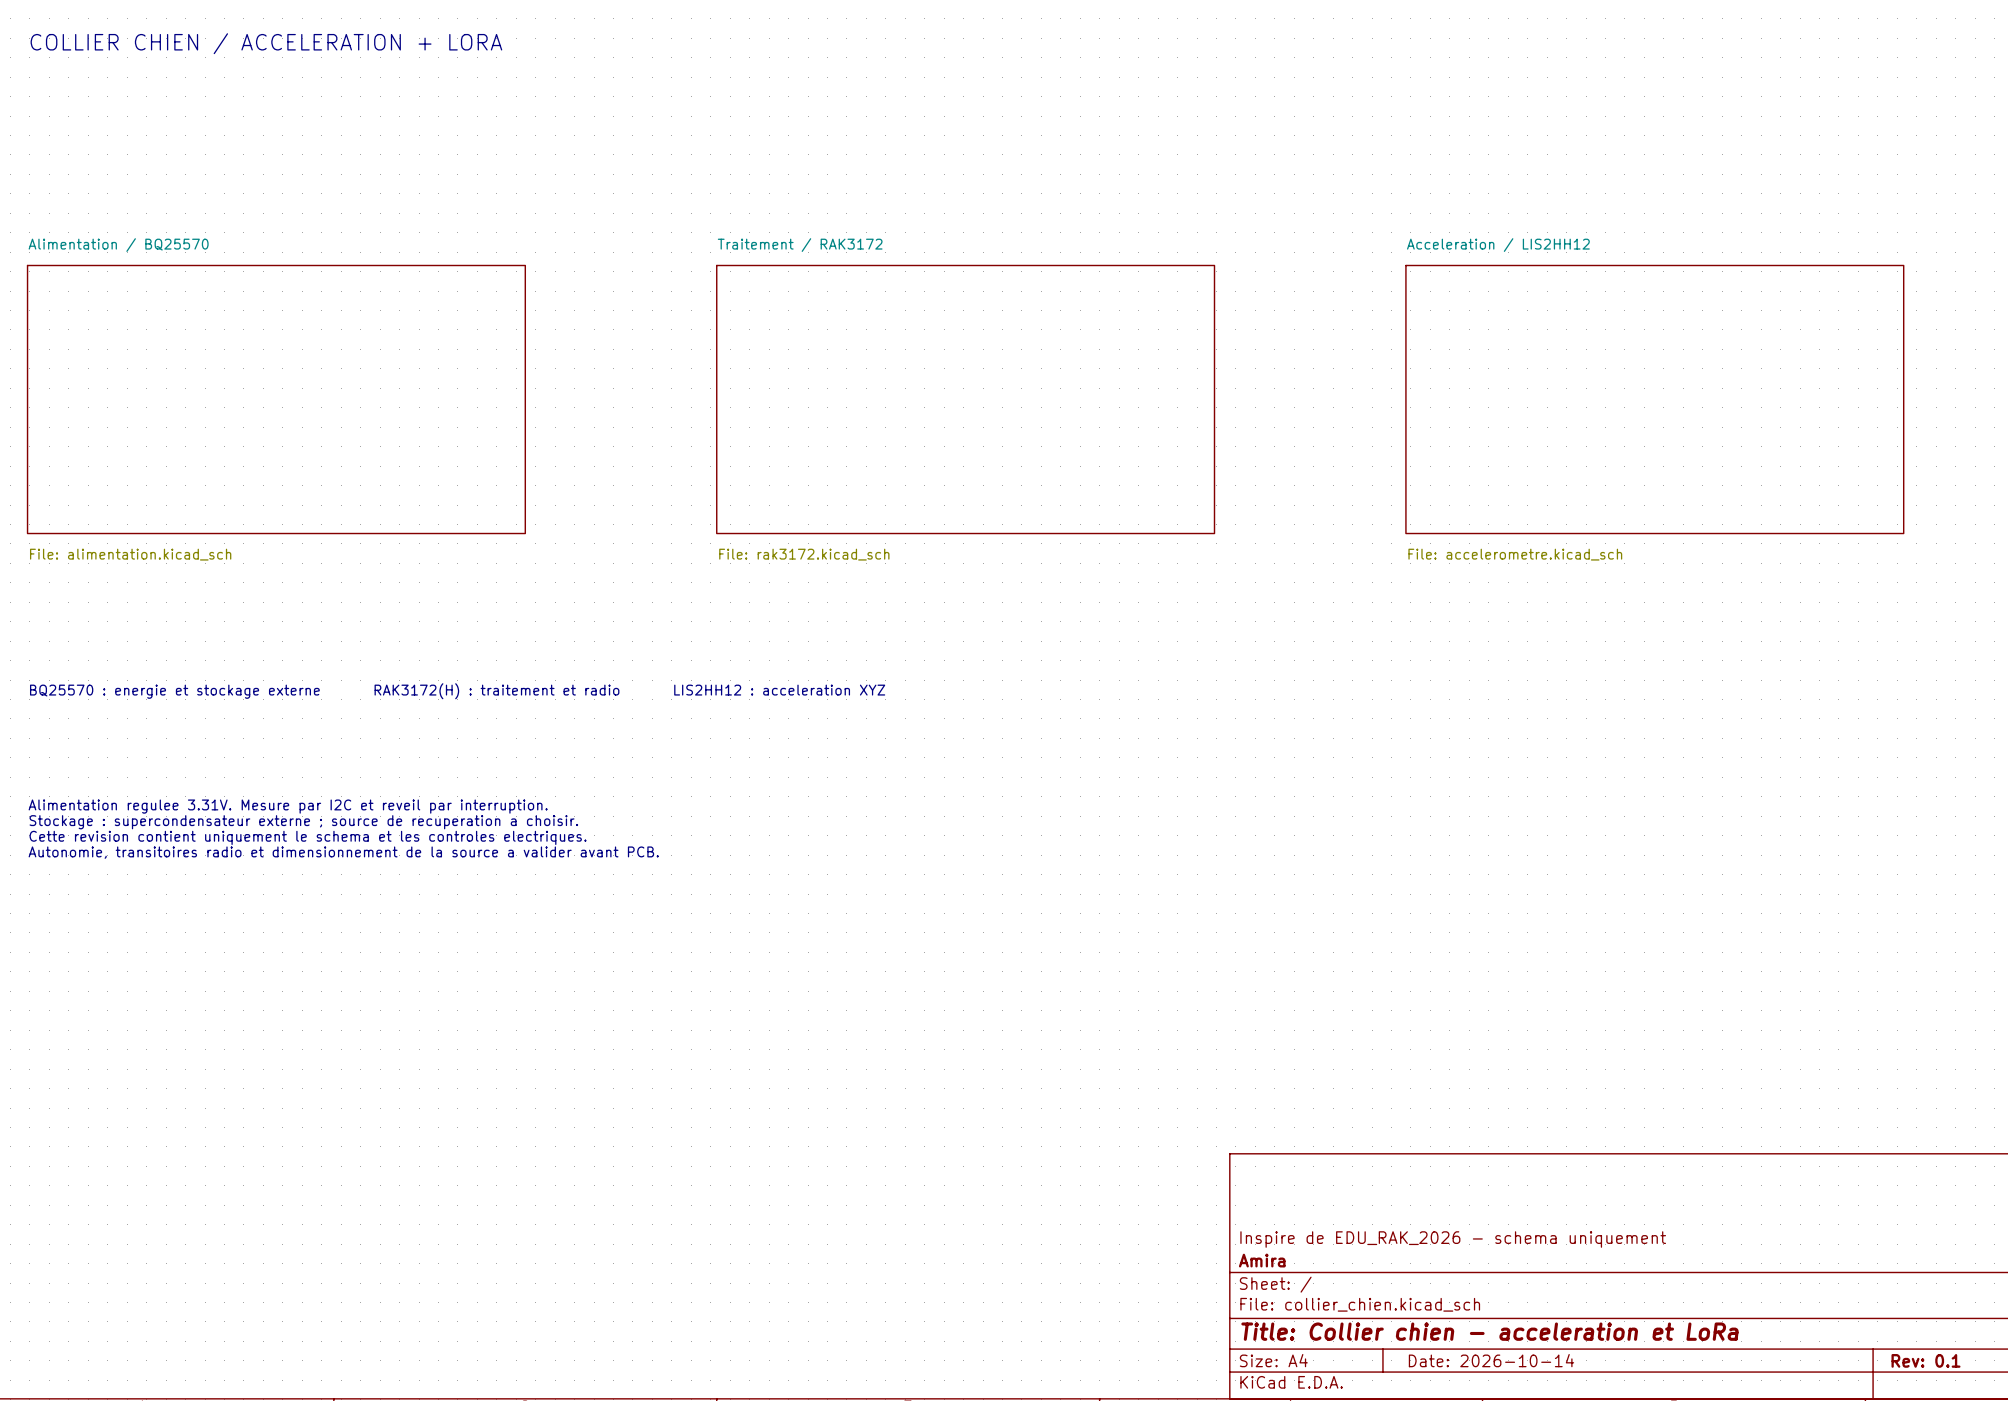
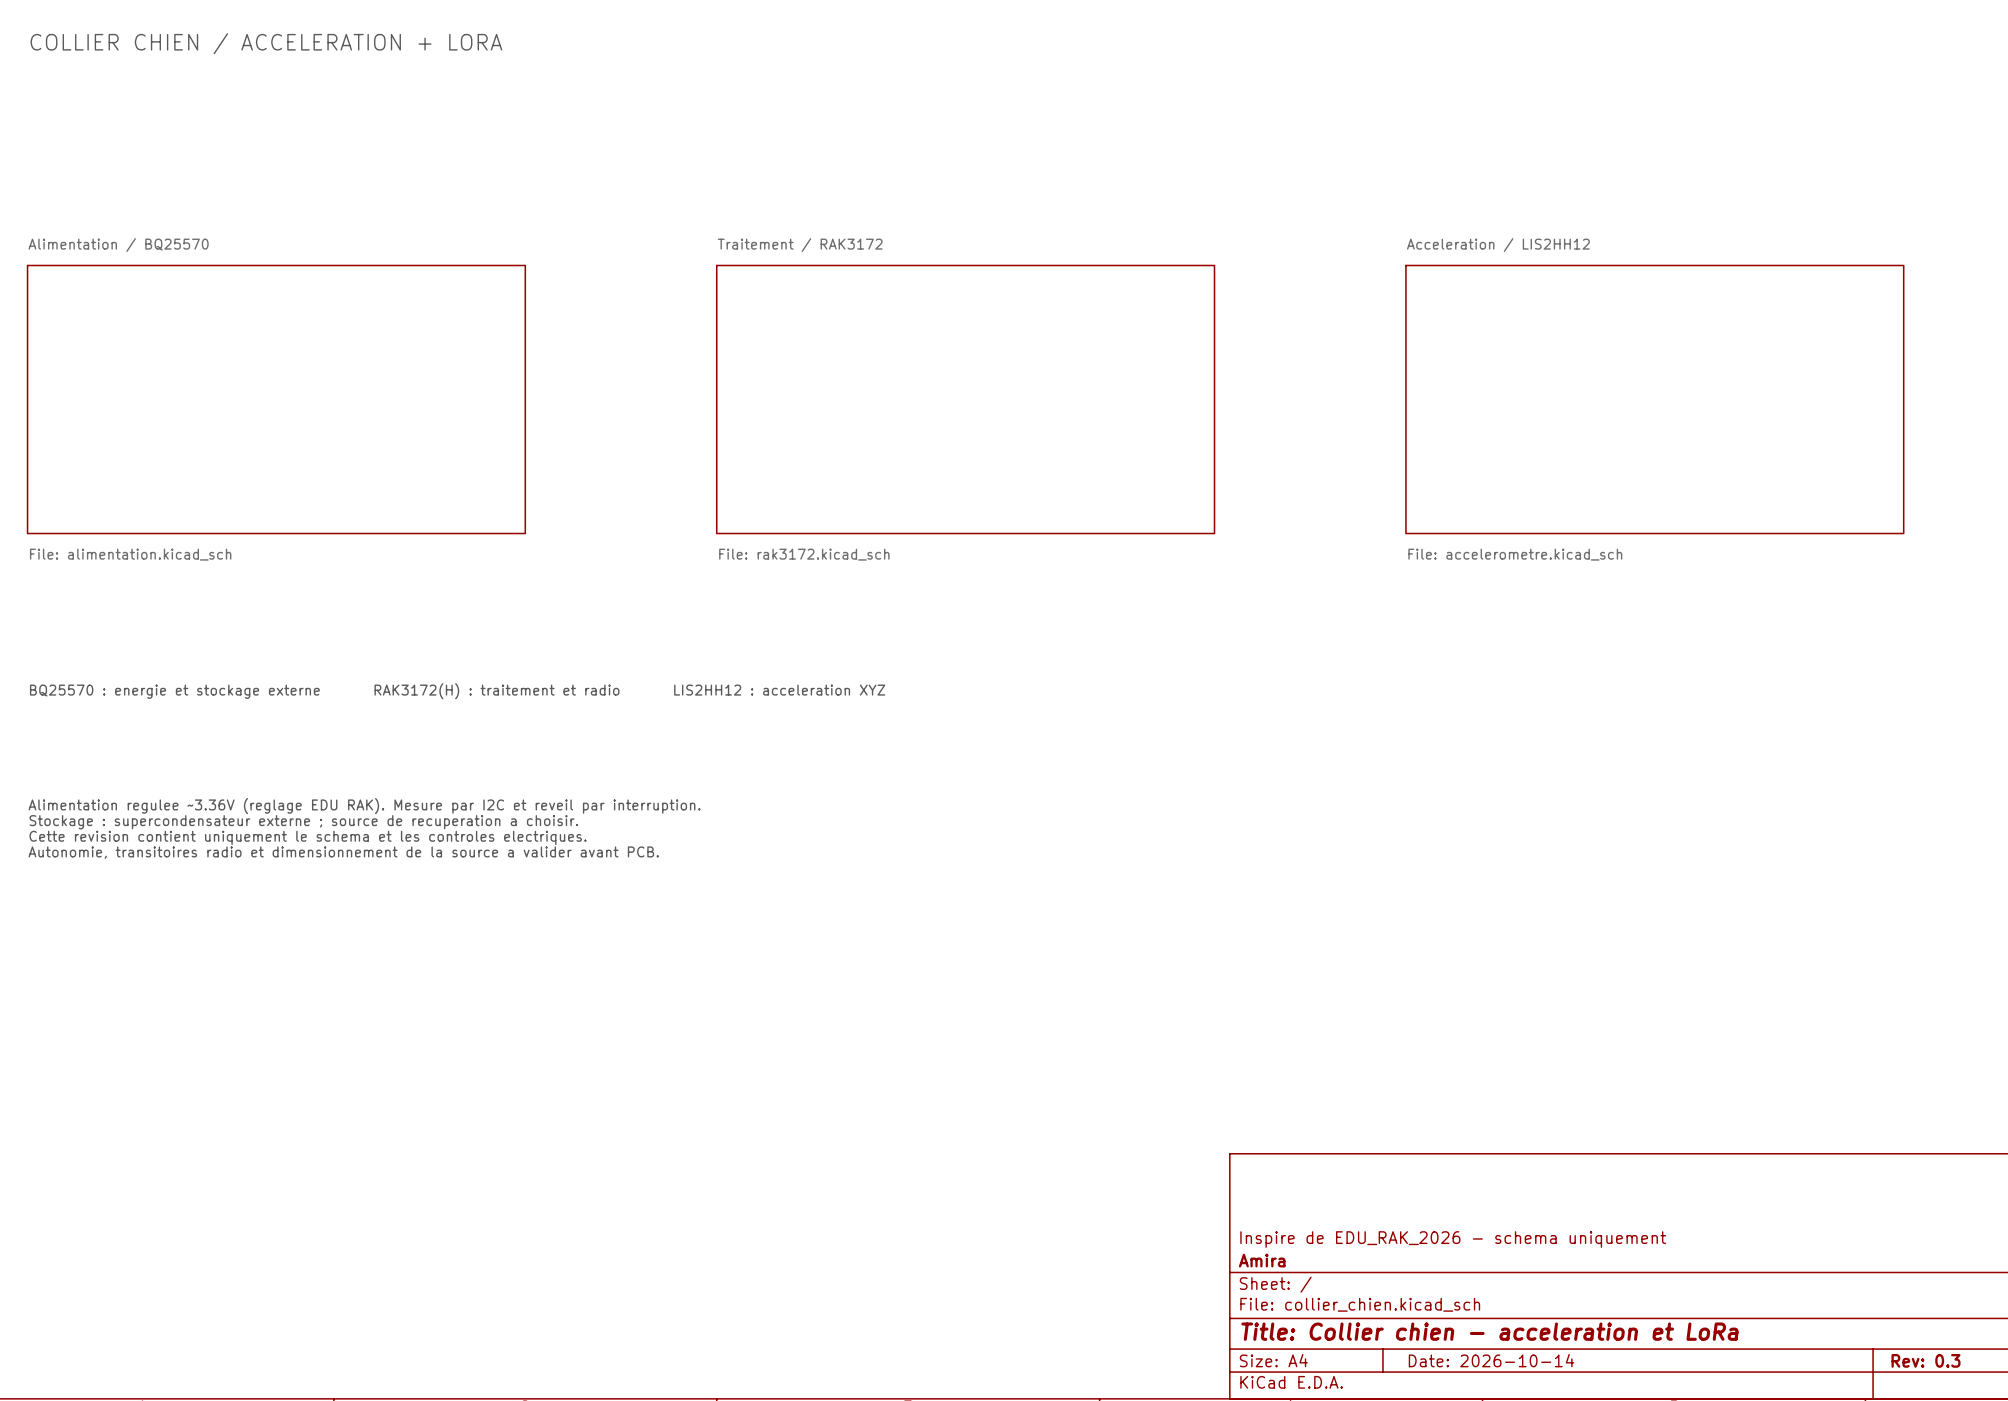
text: Alimentation regulee 3.31V. Mesure par I2C et reveil par interruption. (288, 806) -> Alimentation regulee ~3.36V (reglage EDU RAK). Mesure par I2C et reveil par interruption. (364, 806)
title block: Rev: 0.1 (1925, 1360) -> Rev: 0.3 (1925, 1360)

